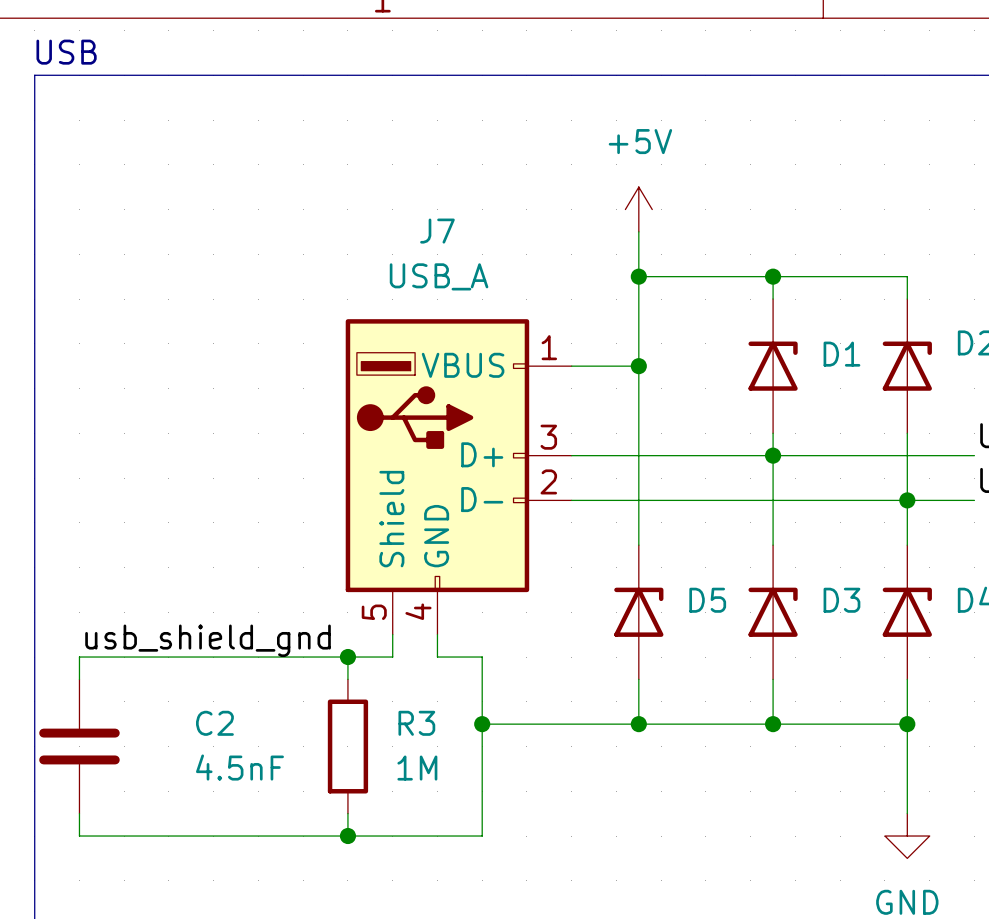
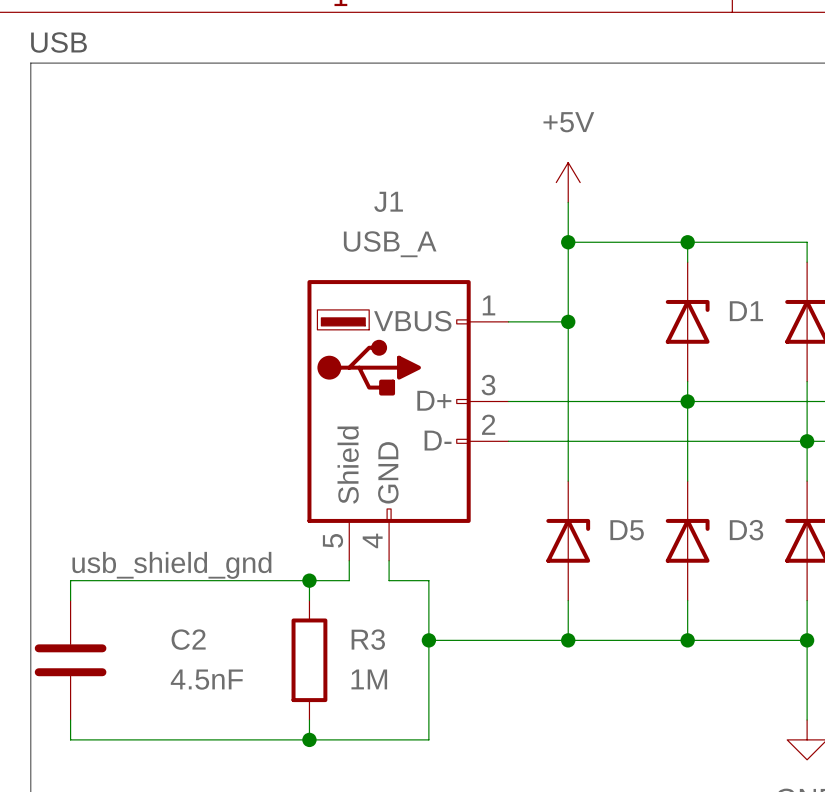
J7 name: J7 (437, 231) -> J1 (388, 201)

